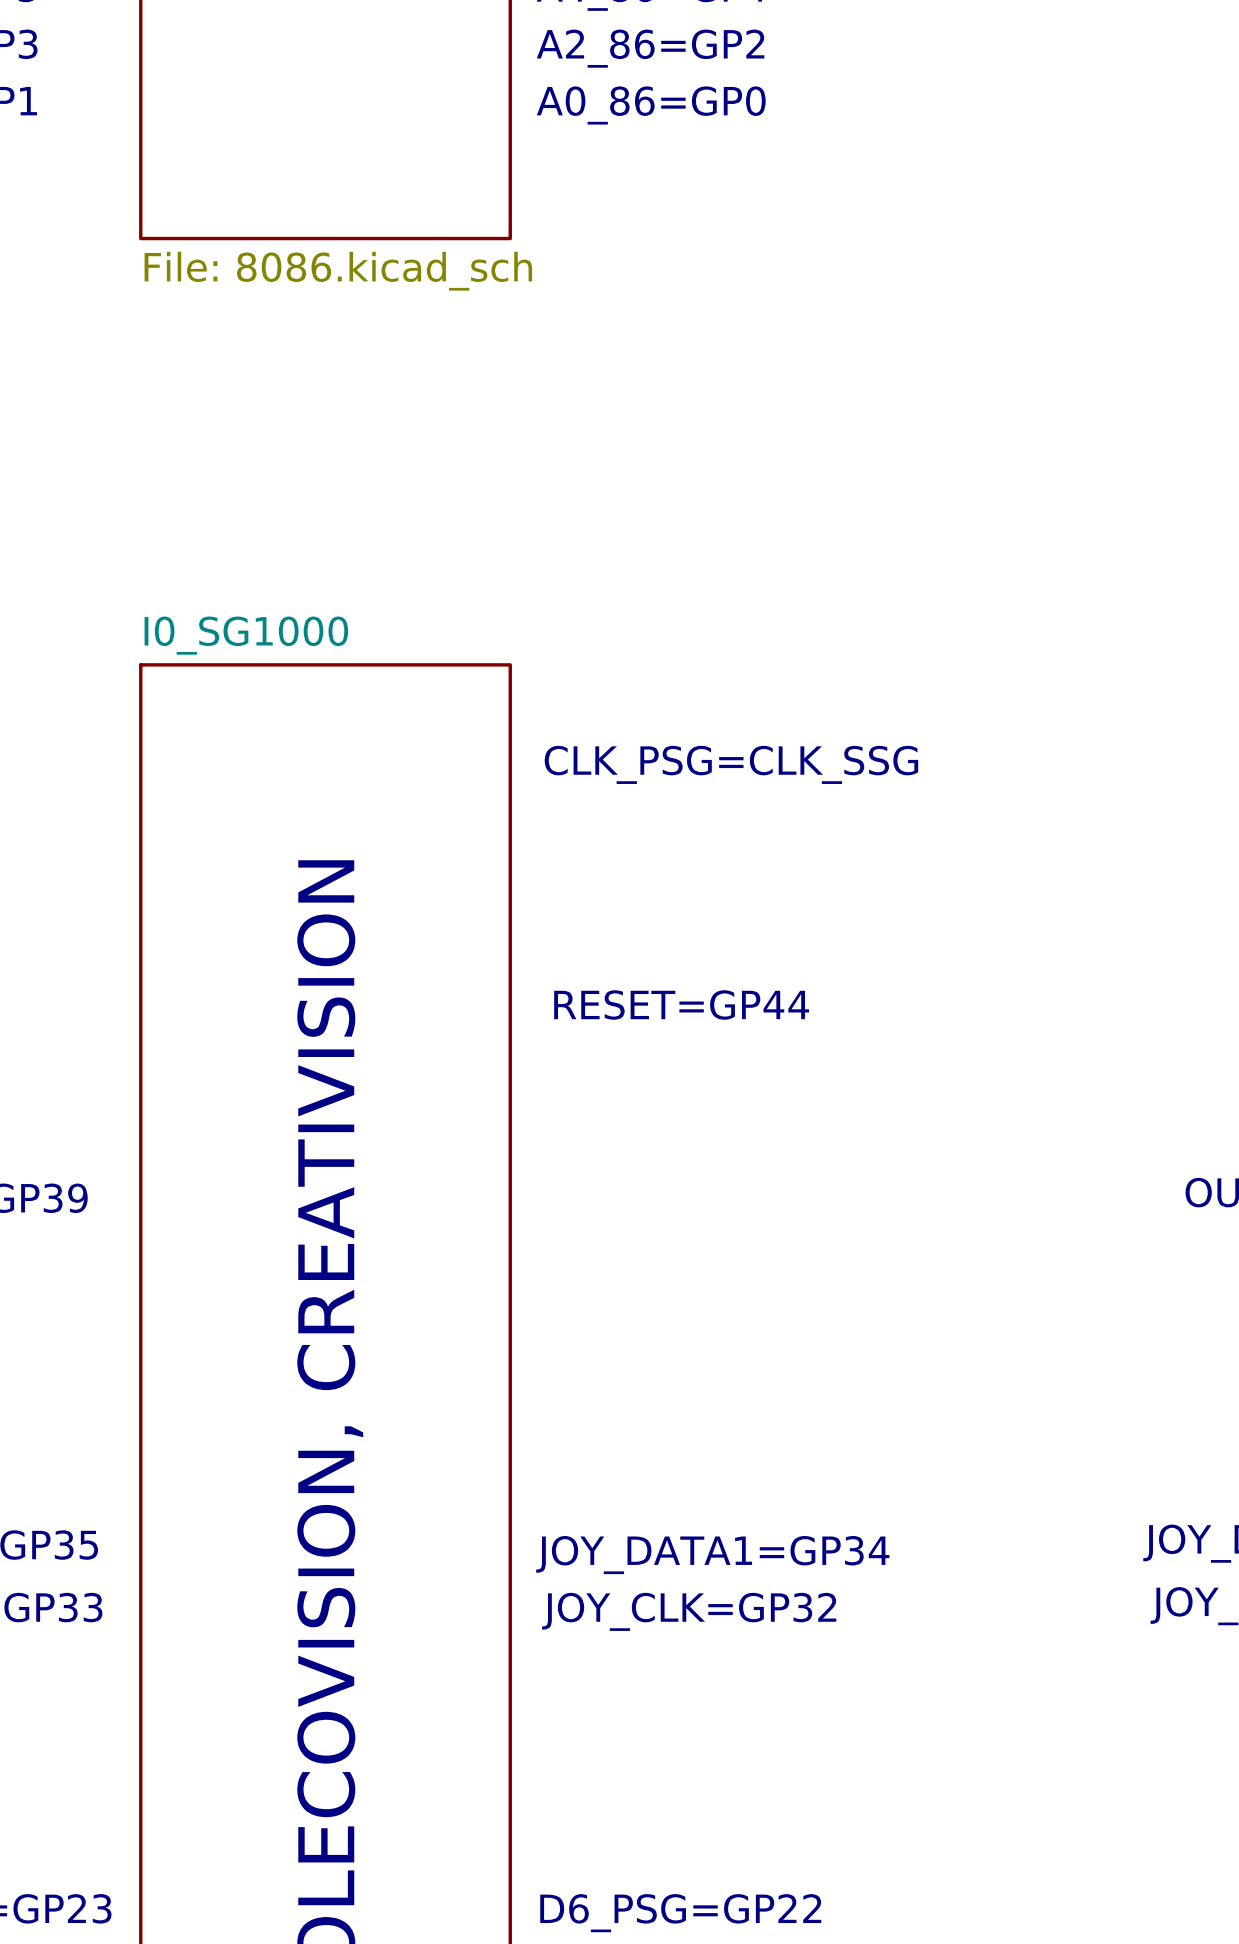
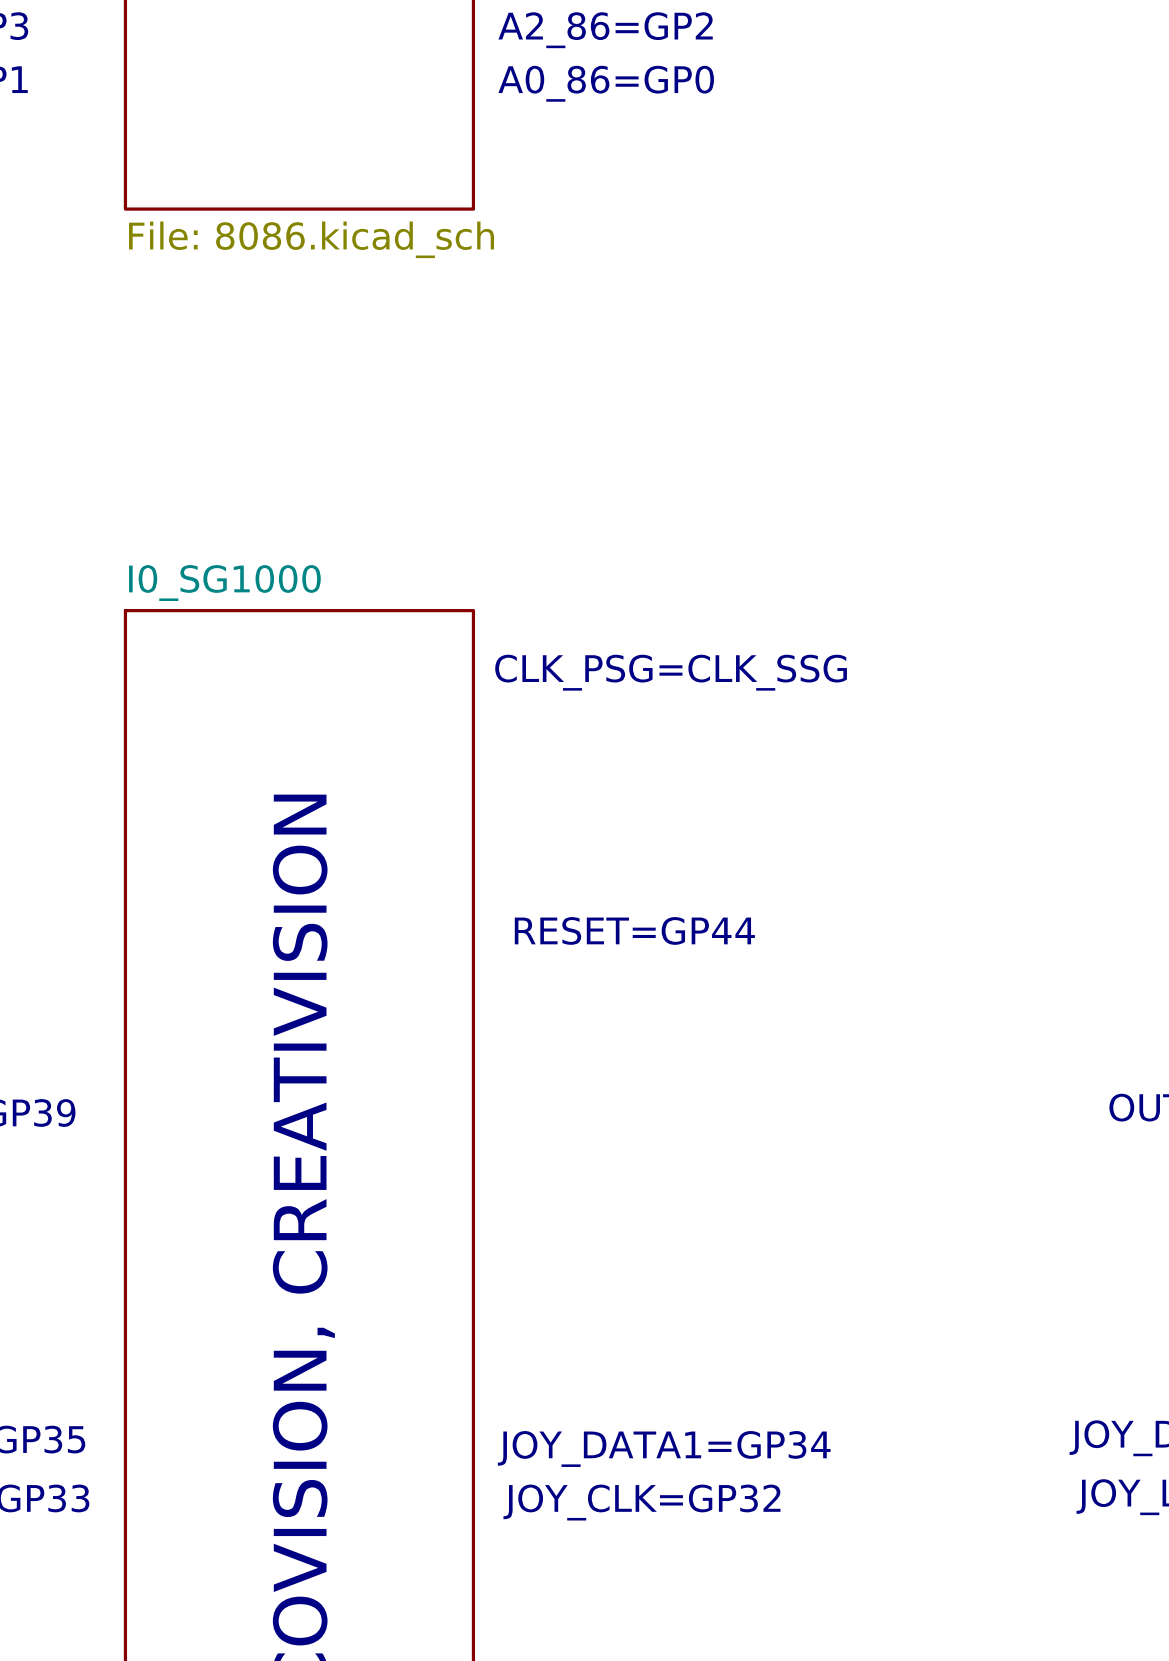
text position: CLK_PSG=CLK_SSG (731, 764) -> CLK_PSG=CLK_SSG (671, 672)

